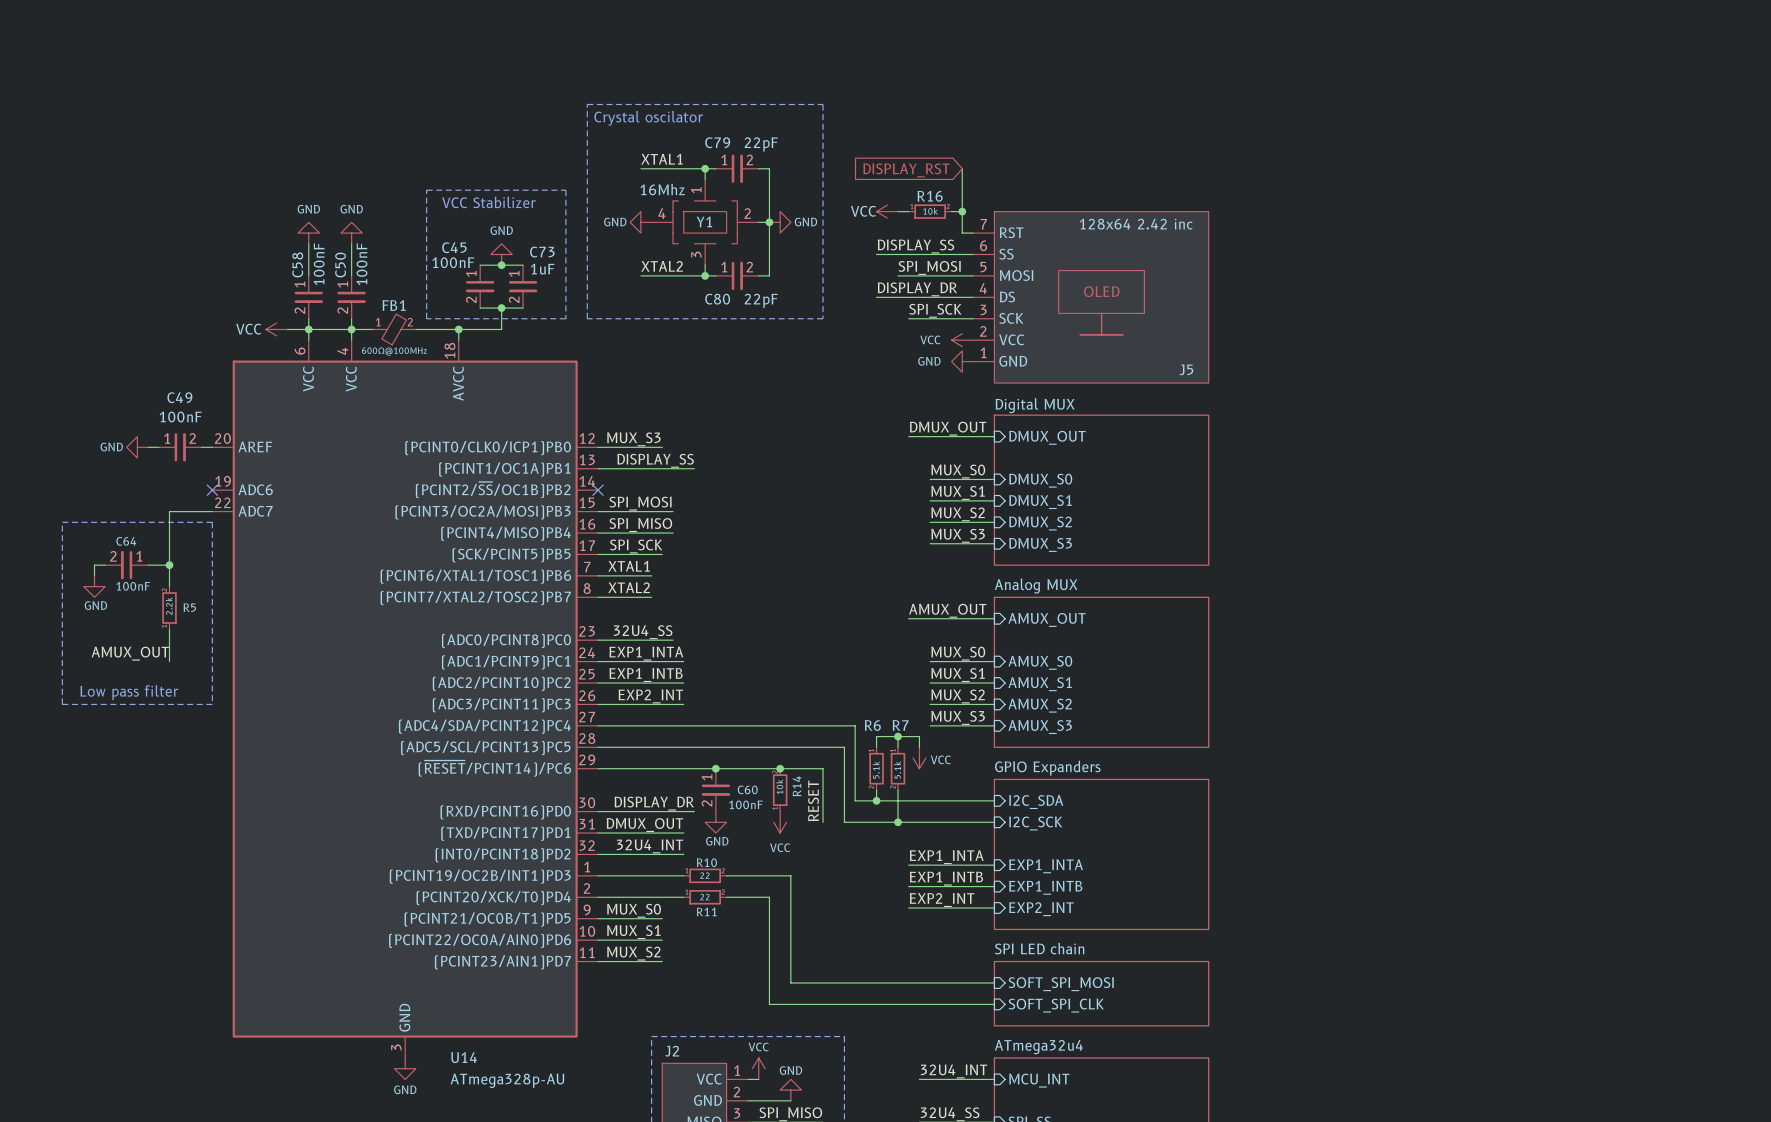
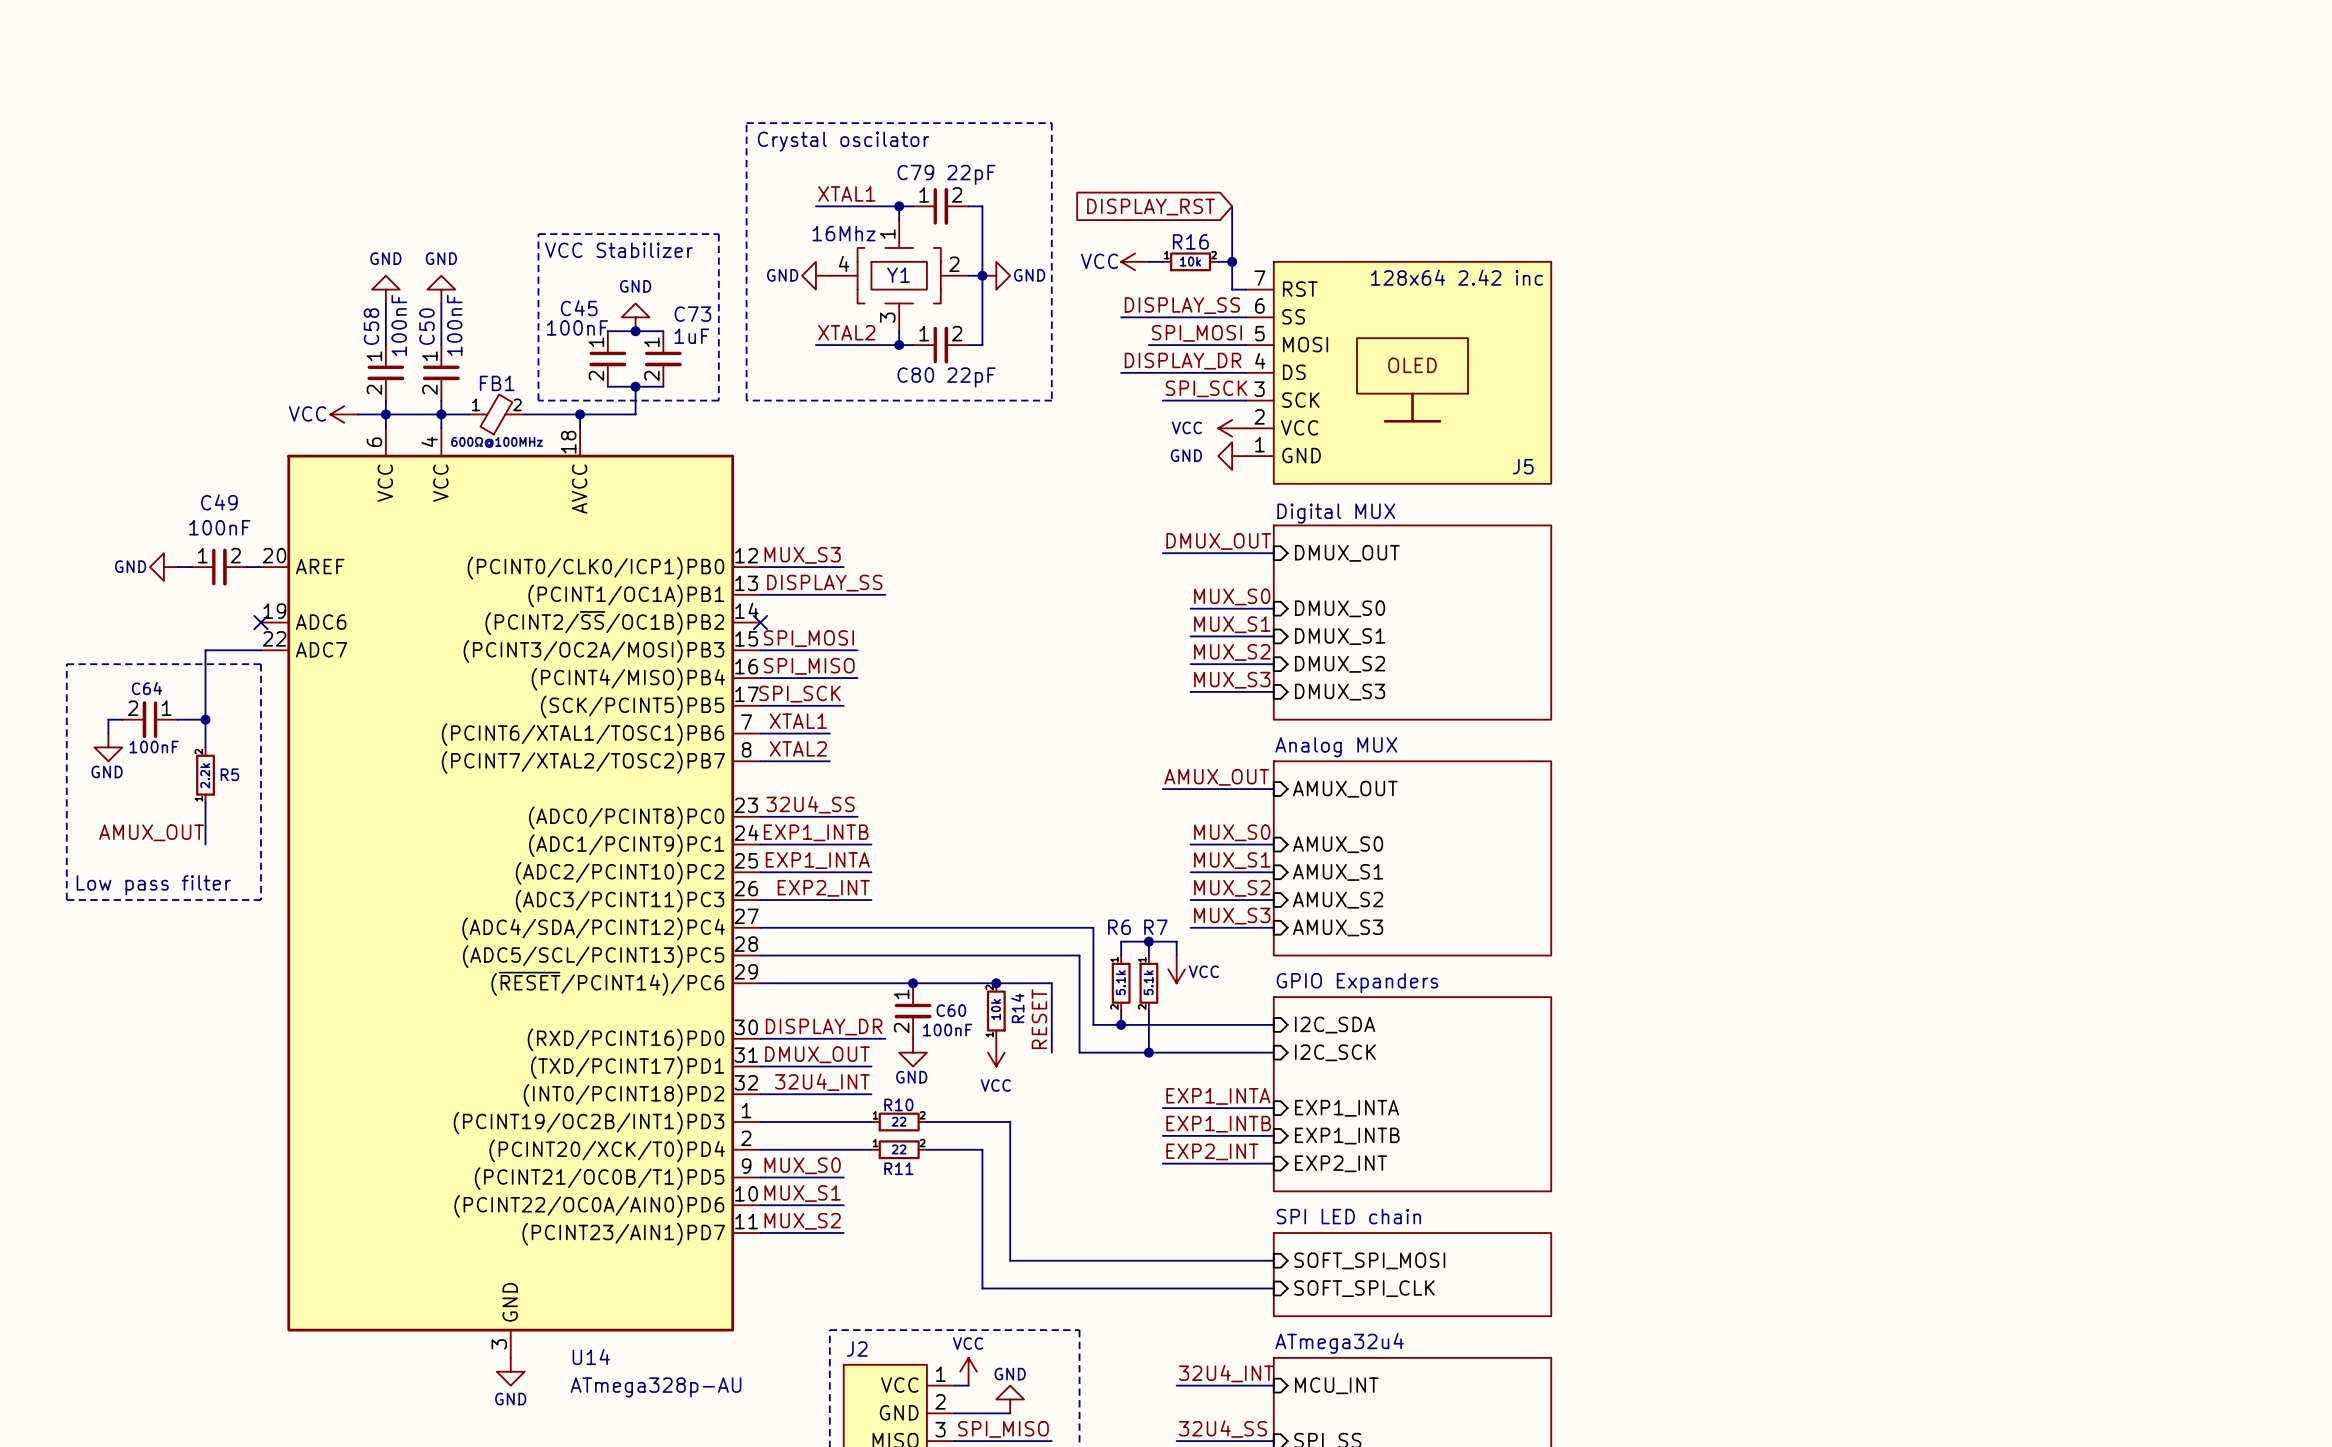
label: EXP1_INTA (646, 653) -> EXP1_INTB (816, 832)
label: EXP1_INTB (646, 675) -> EXP1_INTA (817, 860)

